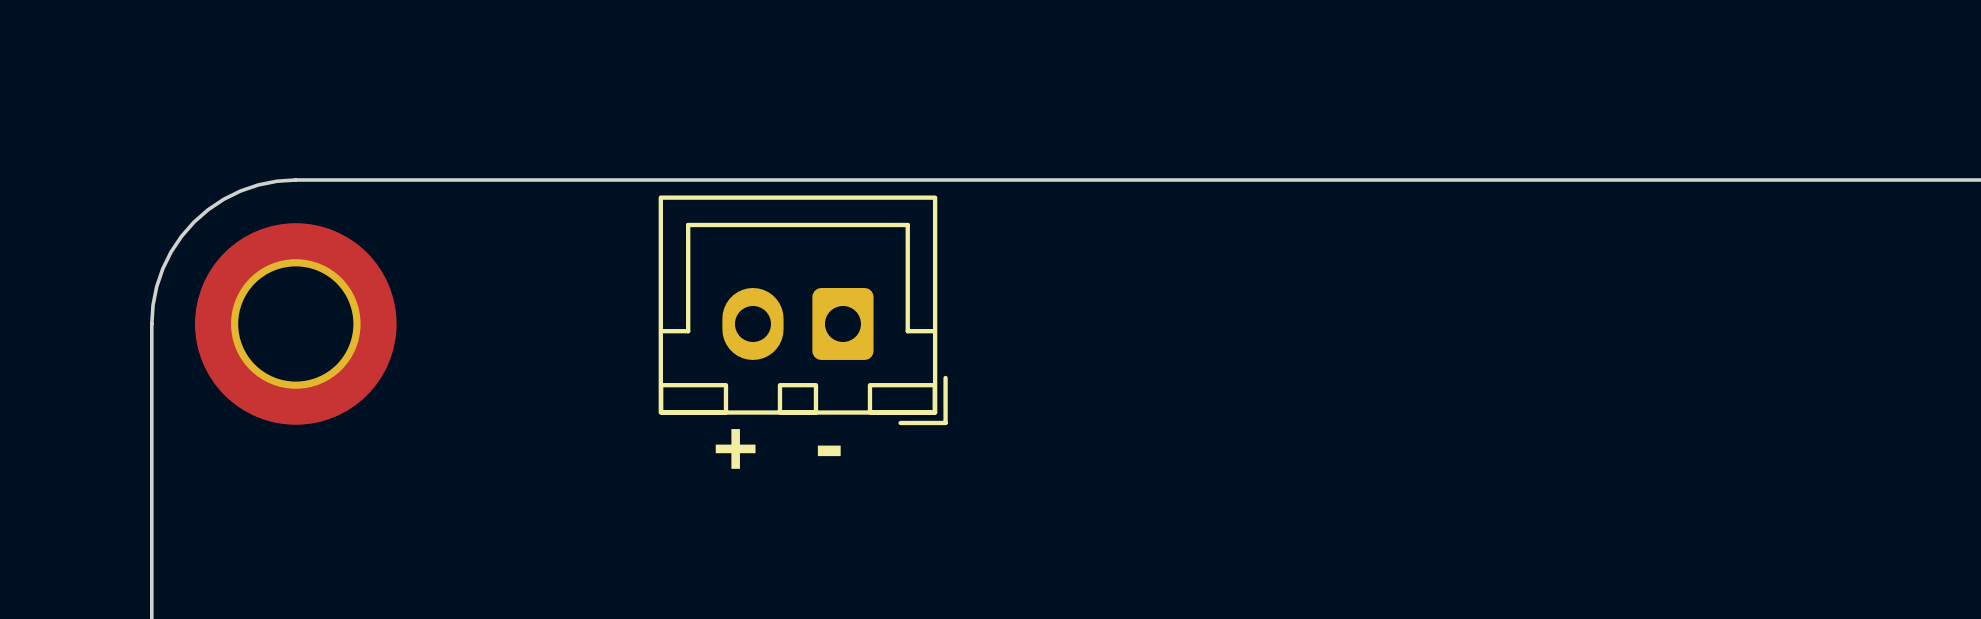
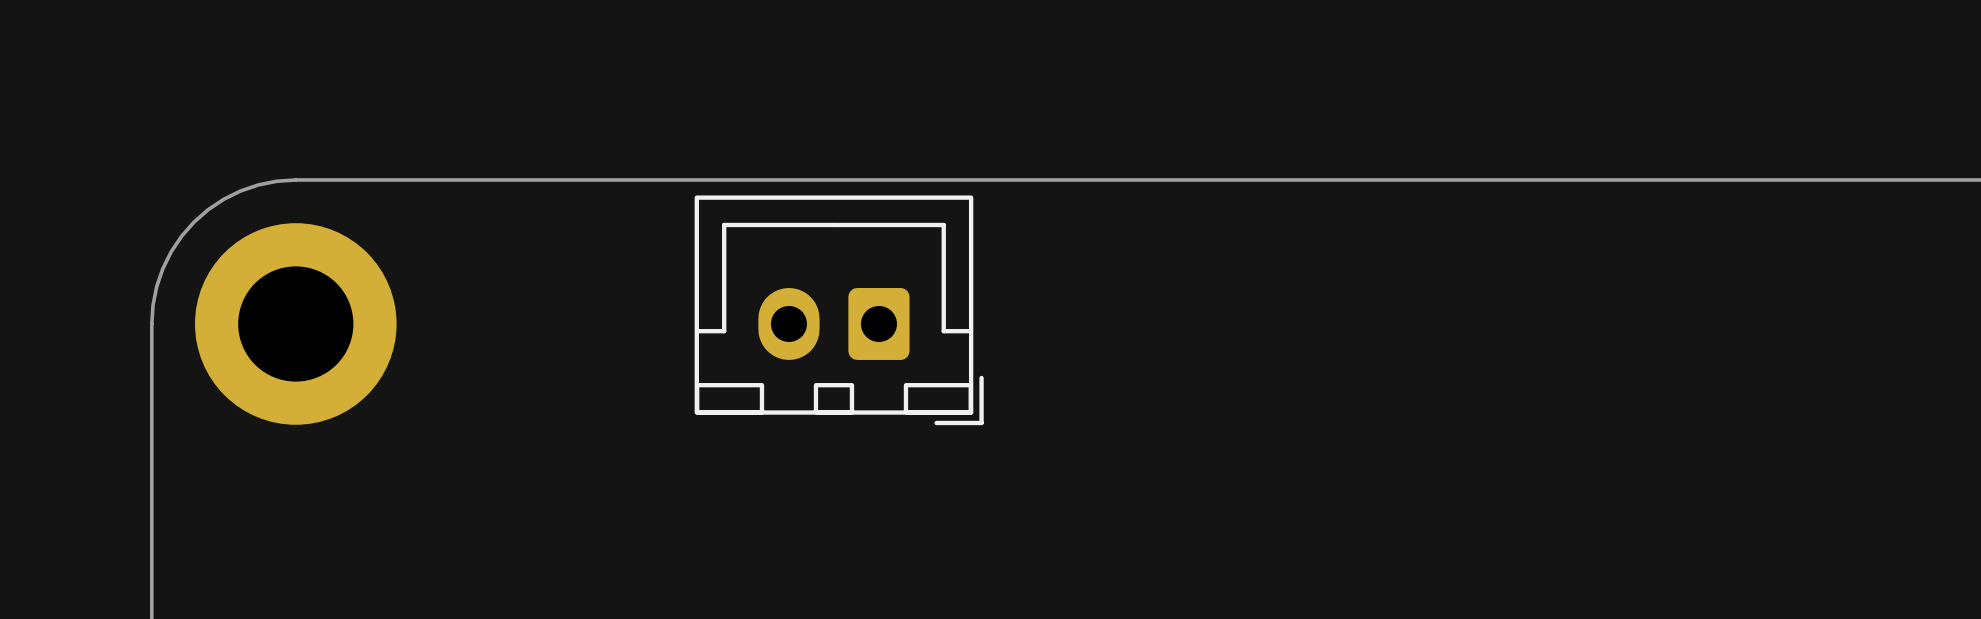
part position: (803, 310) -> (839, 310)
text: + (735, 448) -> none
text: - (829, 450) -> none

